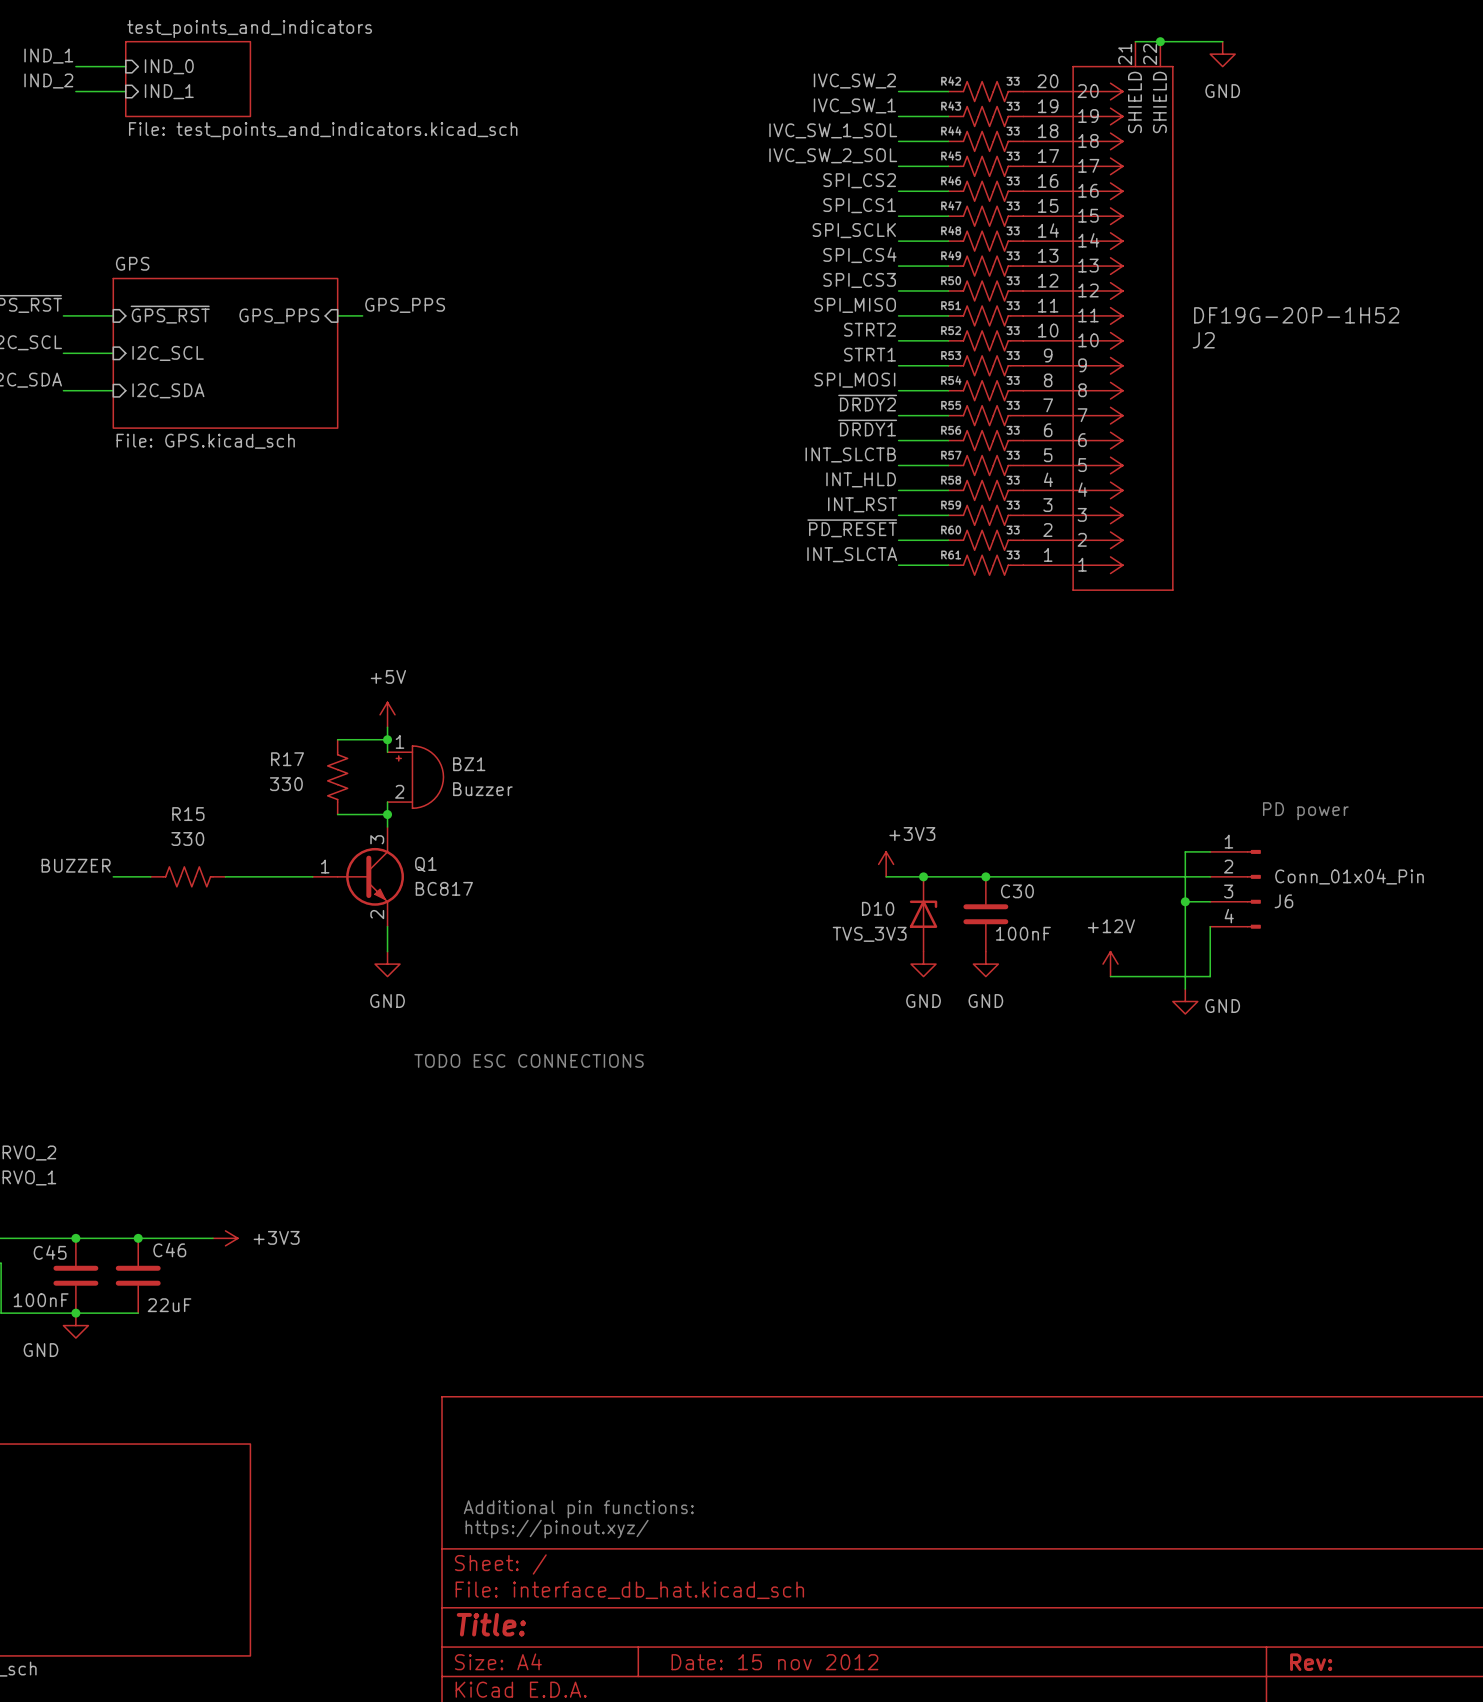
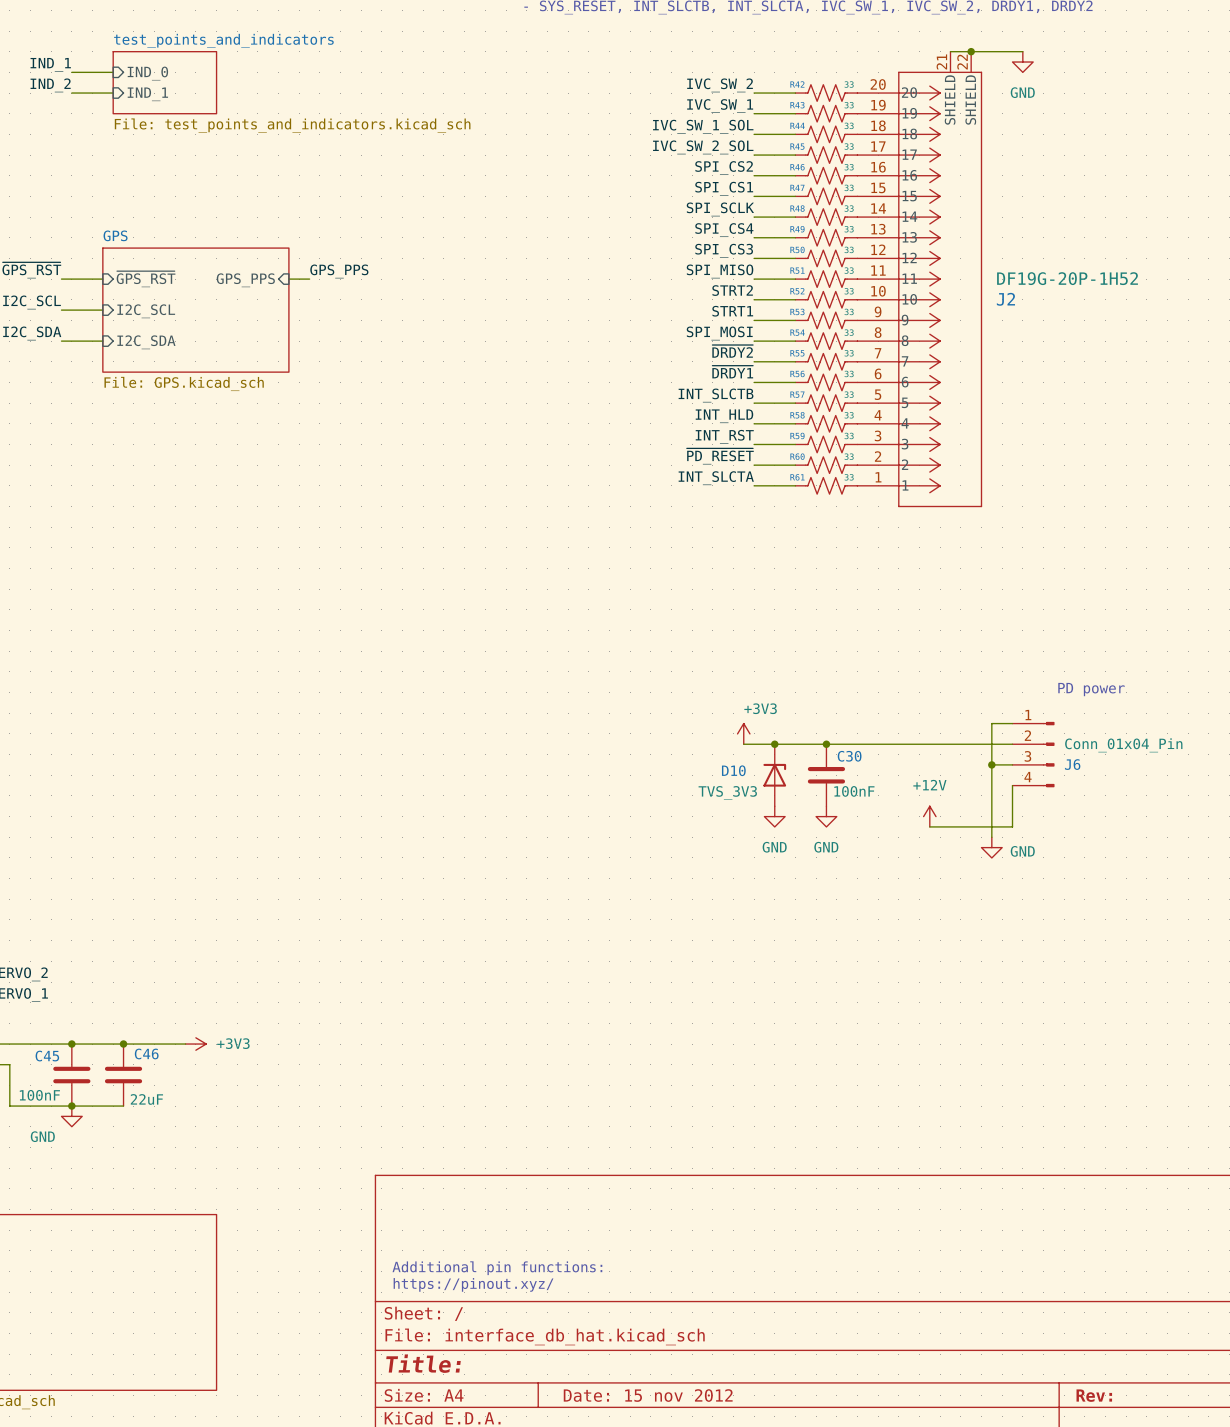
power symbol: +5V (387, 714) -> none
wire: (387, 727) (387, 752) -> none
wire: (337, 739) (387, 739) -> none
junction: (387, 739) -> none
R17: 330 (337, 777) -> none
BZ1: Buzzer (415, 777) -> none
wire: (387, 802) (387, 826) -> none
wire: (337, 814) (387, 814) -> none
junction: (387, 814) -> none
label: BUZZER (76, 865) -> none
wire: (113, 876) (150, 876) -> none
R15: 330 (188, 876) -> none
wire: (225, 876) (312, 876) -> none
Q1: BC817 (358, 876) -> none
wire: (387, 926) (387, 951) -> none
power symbol: GND (387, 964) -> none
text: TODO ESC CONNECTIONS (529, 1060) -> none

